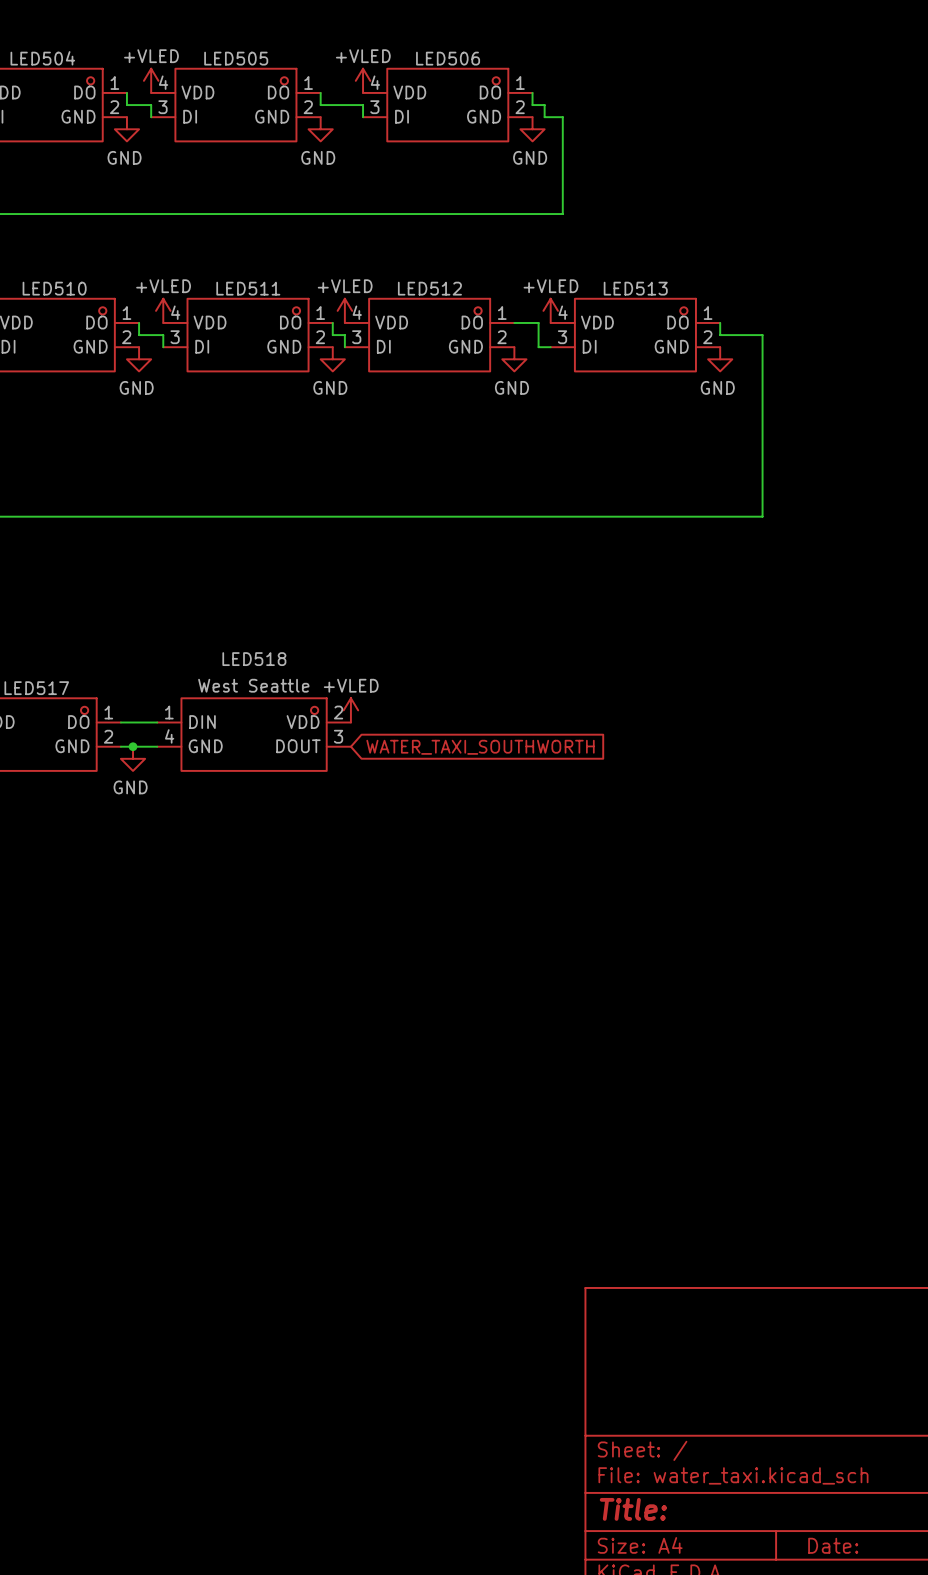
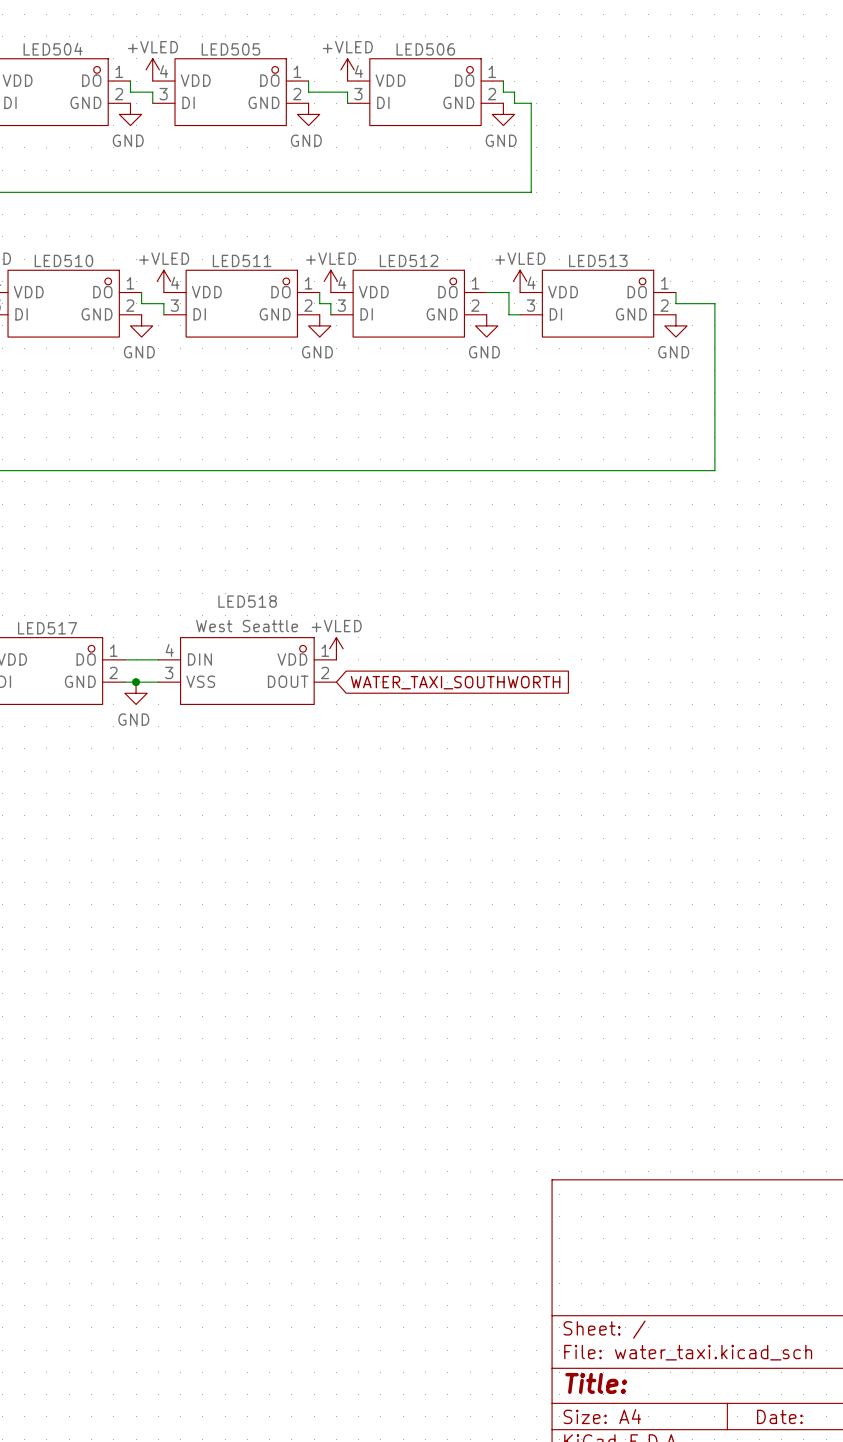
LED518 pin number: 1 (169, 712) -> 4 (169, 650)
LED518 pin number: 2 (338, 712) -> 1 (325, 650)
LED518 pin number: 4 (169, 736) -> 3 (169, 672)
LED518 pin number: 3 (338, 736) -> 2 (325, 672)
LED518 pin name: GND (205, 746) -> VSS (200, 681)

